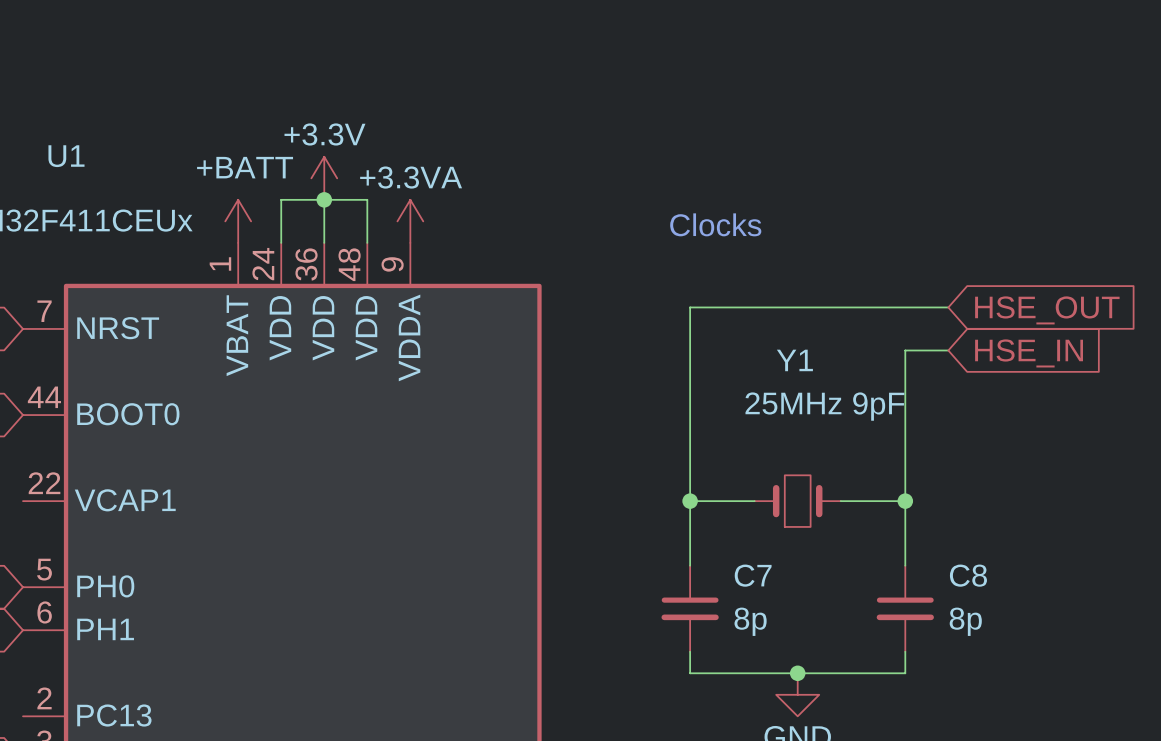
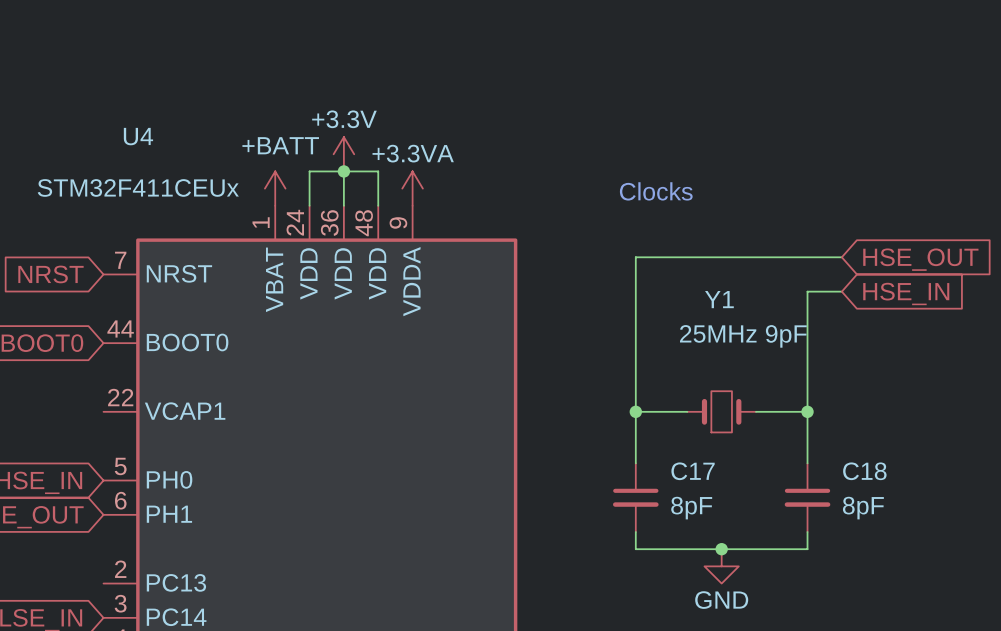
U1 name: U1 (66, 156) -> U4 (138, 136)
C7 name: C7 (753, 575) -> C17 (693, 471)
C8 name: C8 (968, 575) -> C18 (864, 471)
C7 value: 8p (750, 621) -> 8pF (691, 508)
C8 value: 8p (965, 621) -> 8pF (863, 508)

